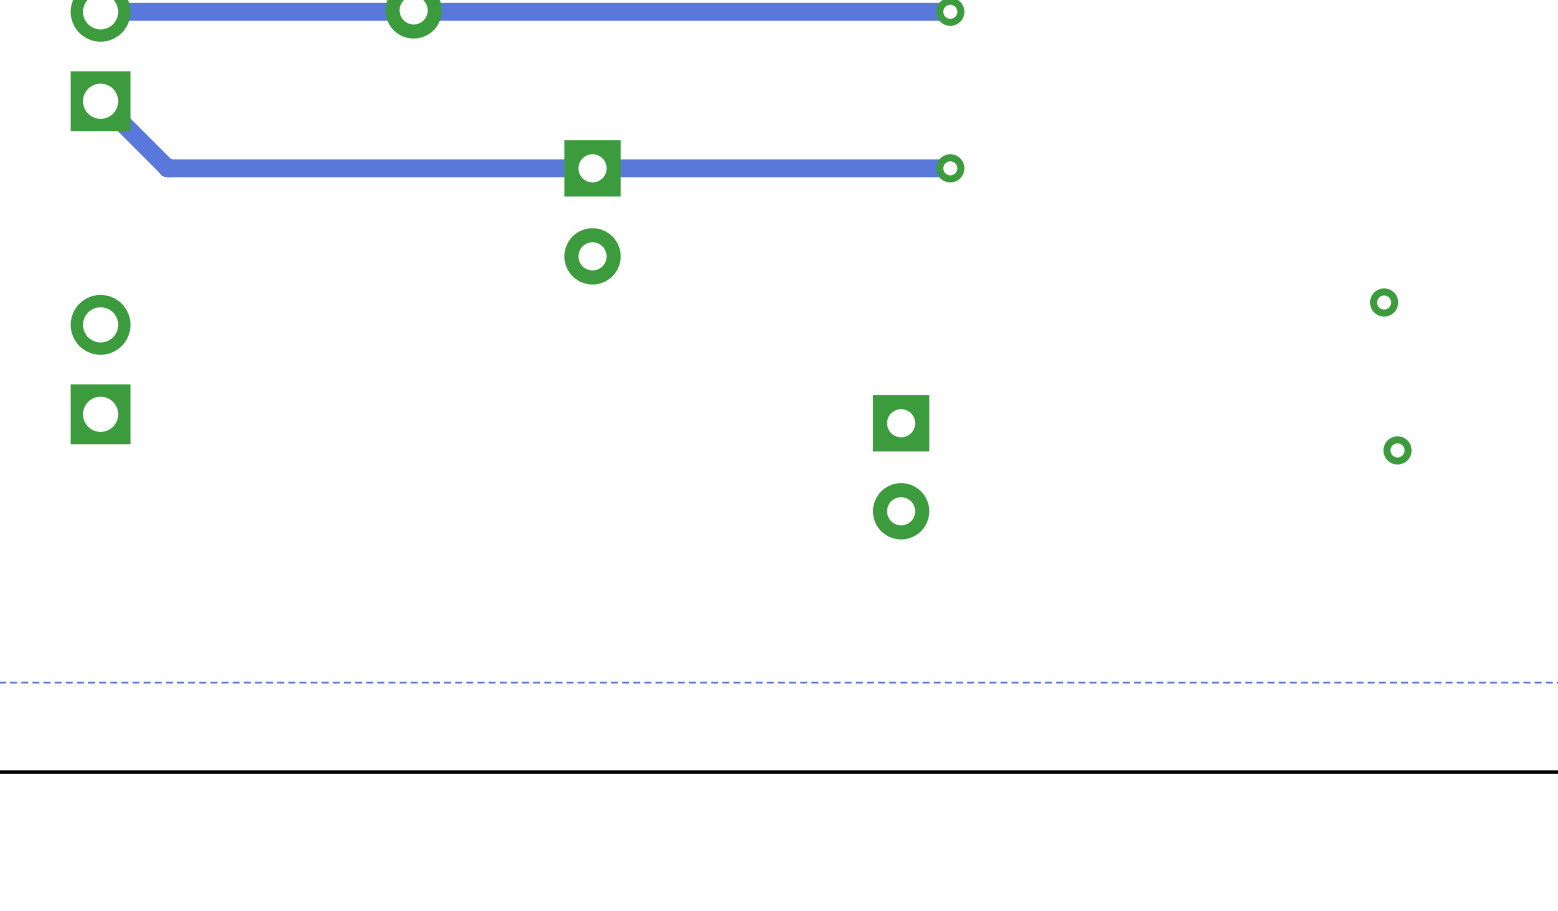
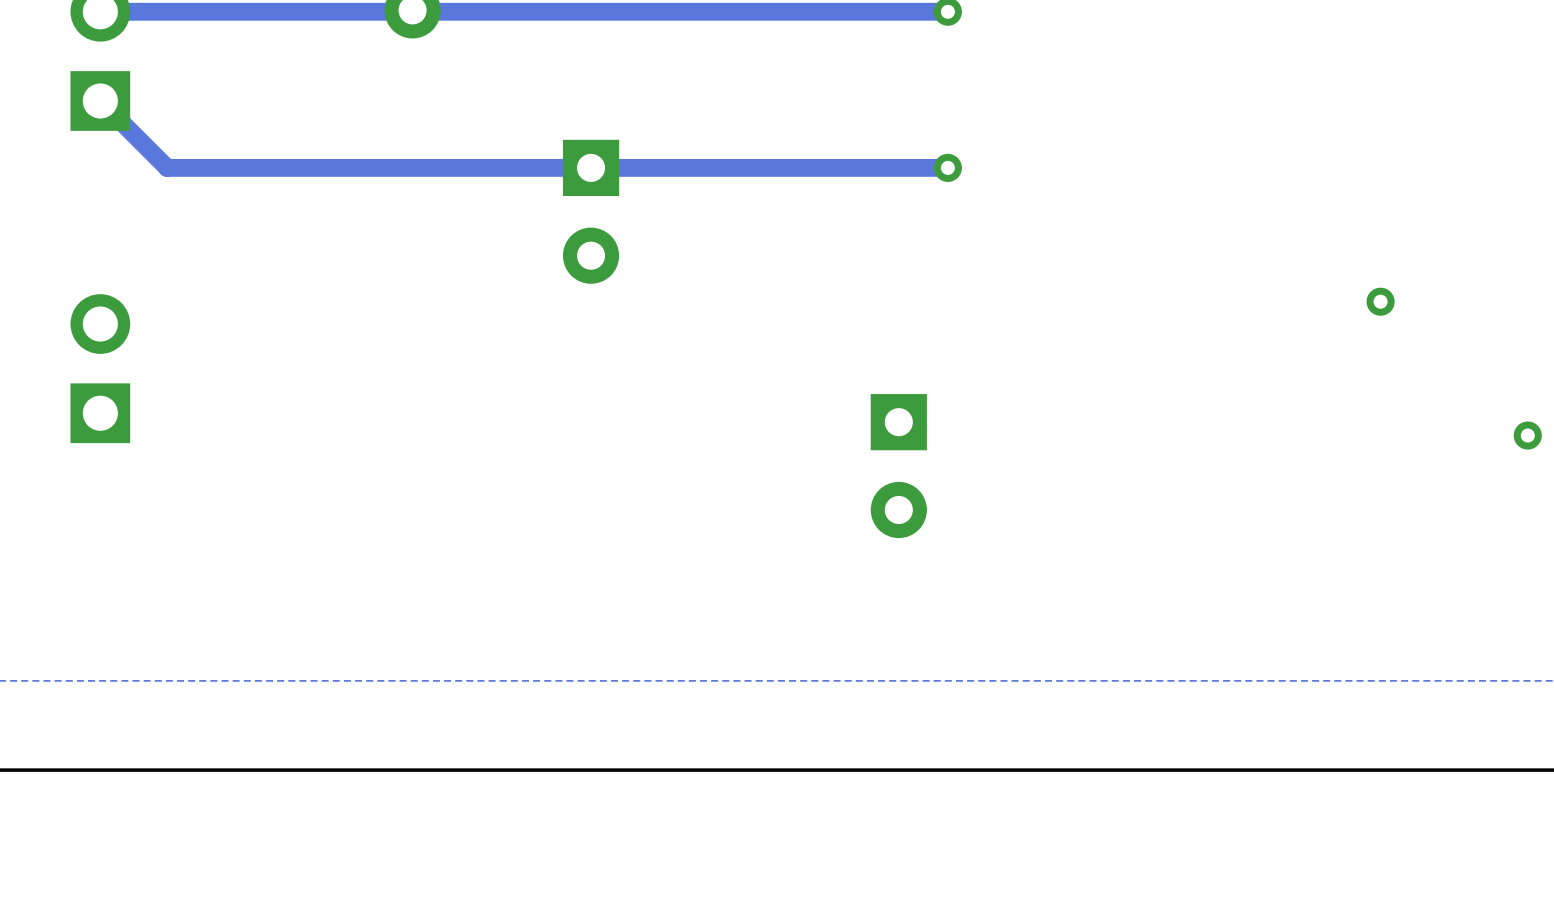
via position: (1397, 450) -> (1527, 435)

